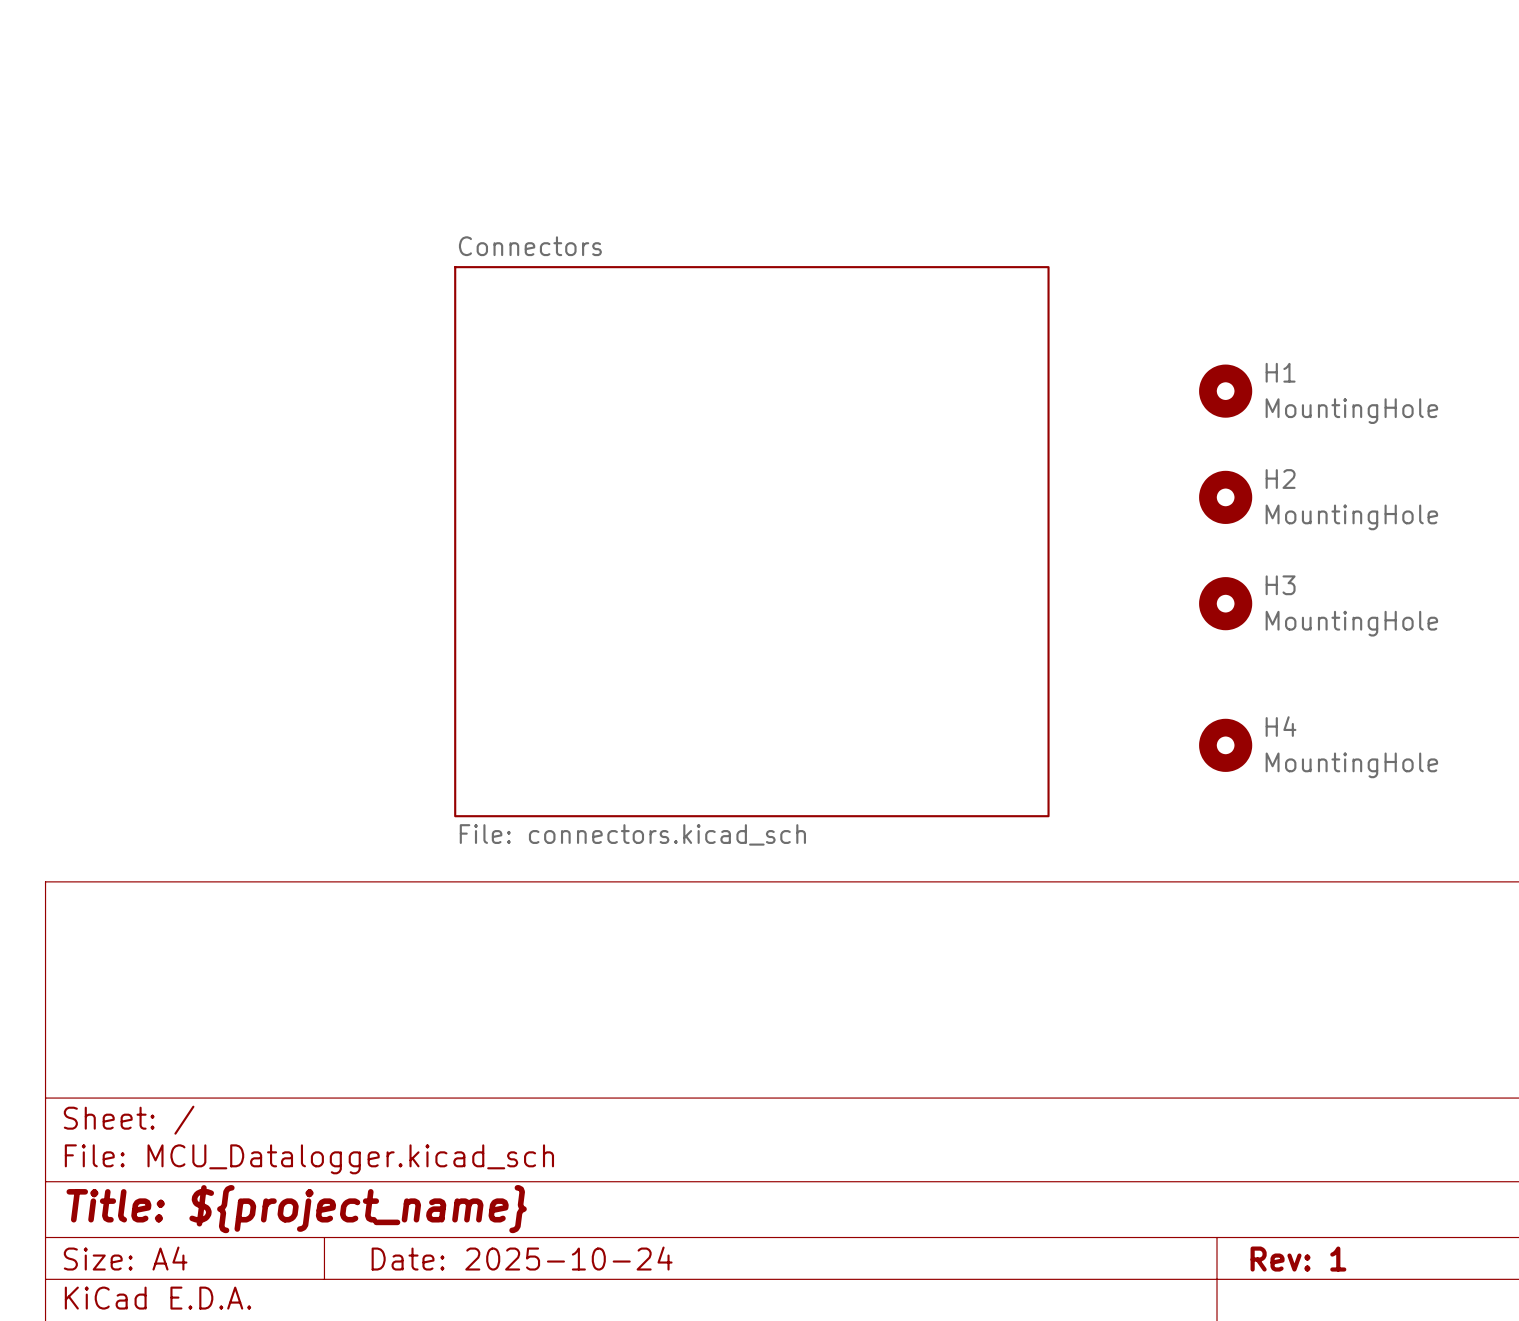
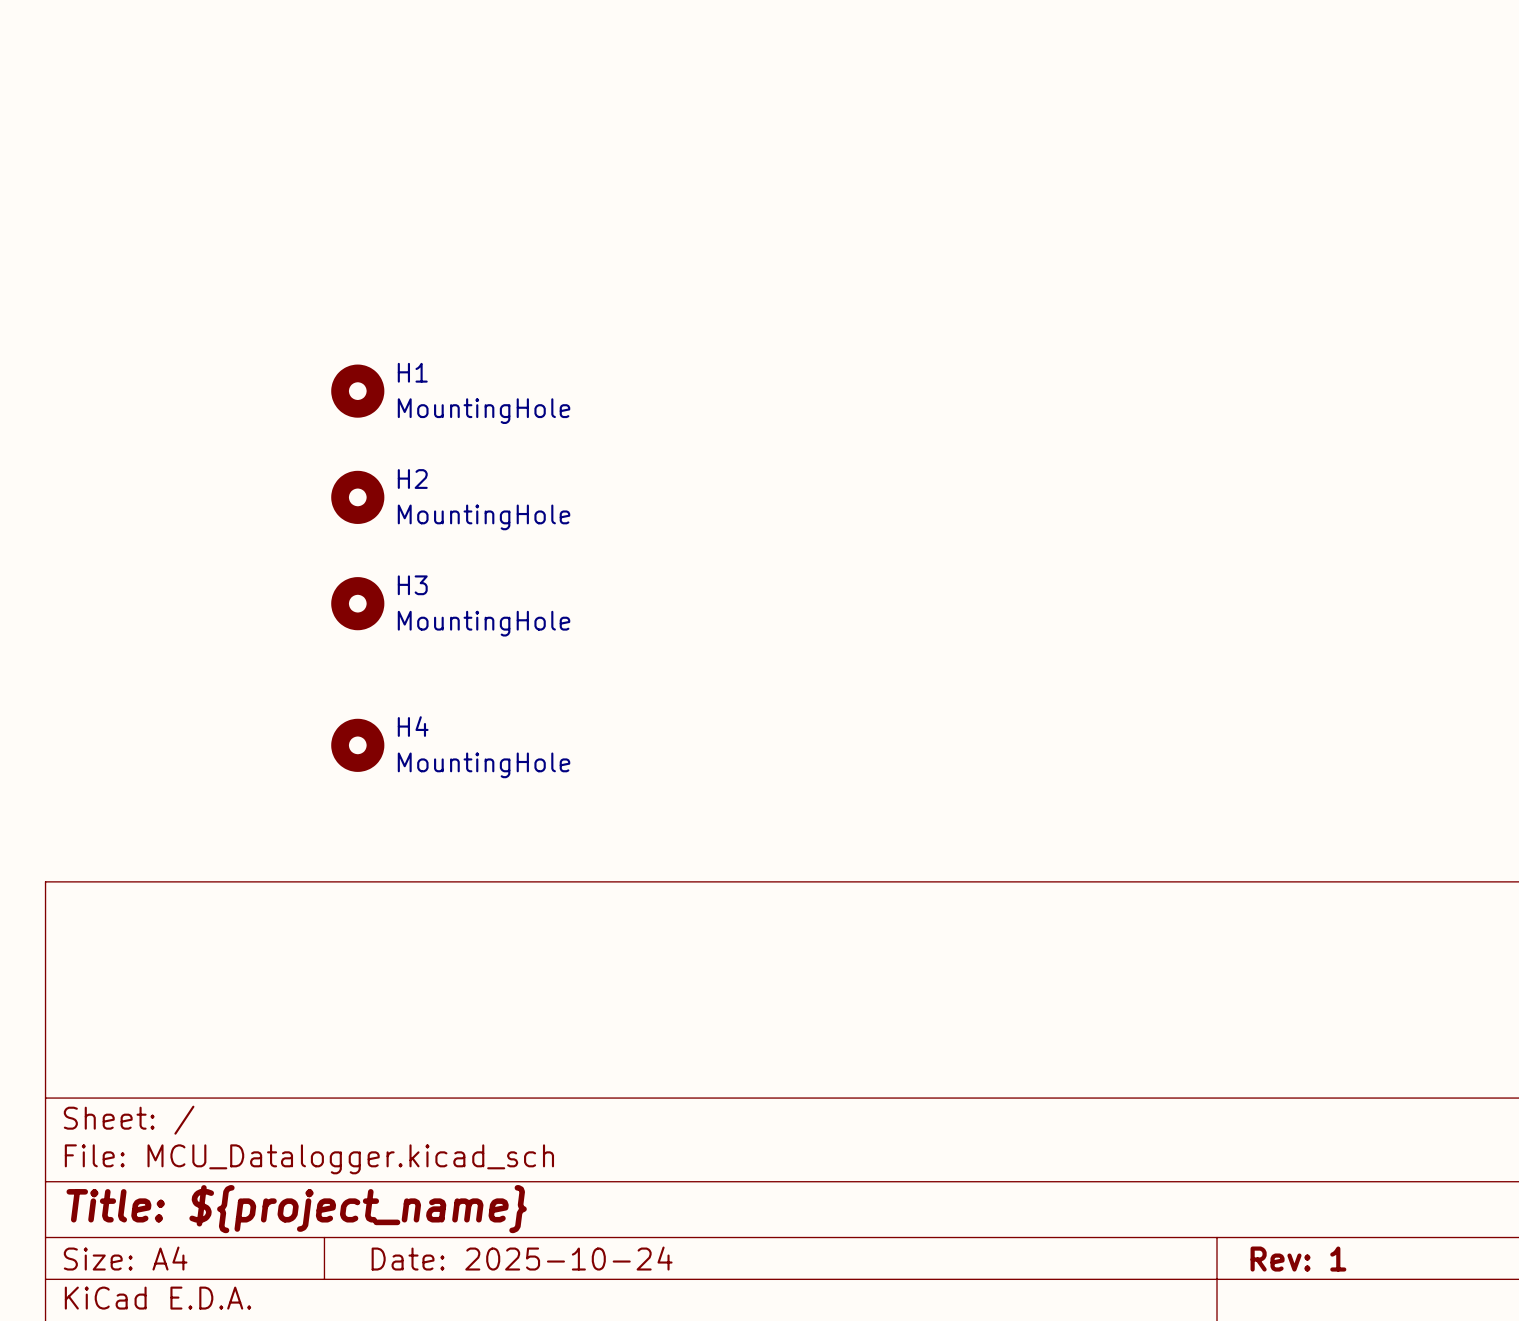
H1 position: (1225, 391) -> (357, 391)
H2 position: (1225, 497) -> (357, 497)
sheet Connectors: File: connectors.kicad_sch (751, 541) -> none
H3 position: (1225, 603) -> (357, 603)
H4 position: (1225, 745) -> (357, 745)

